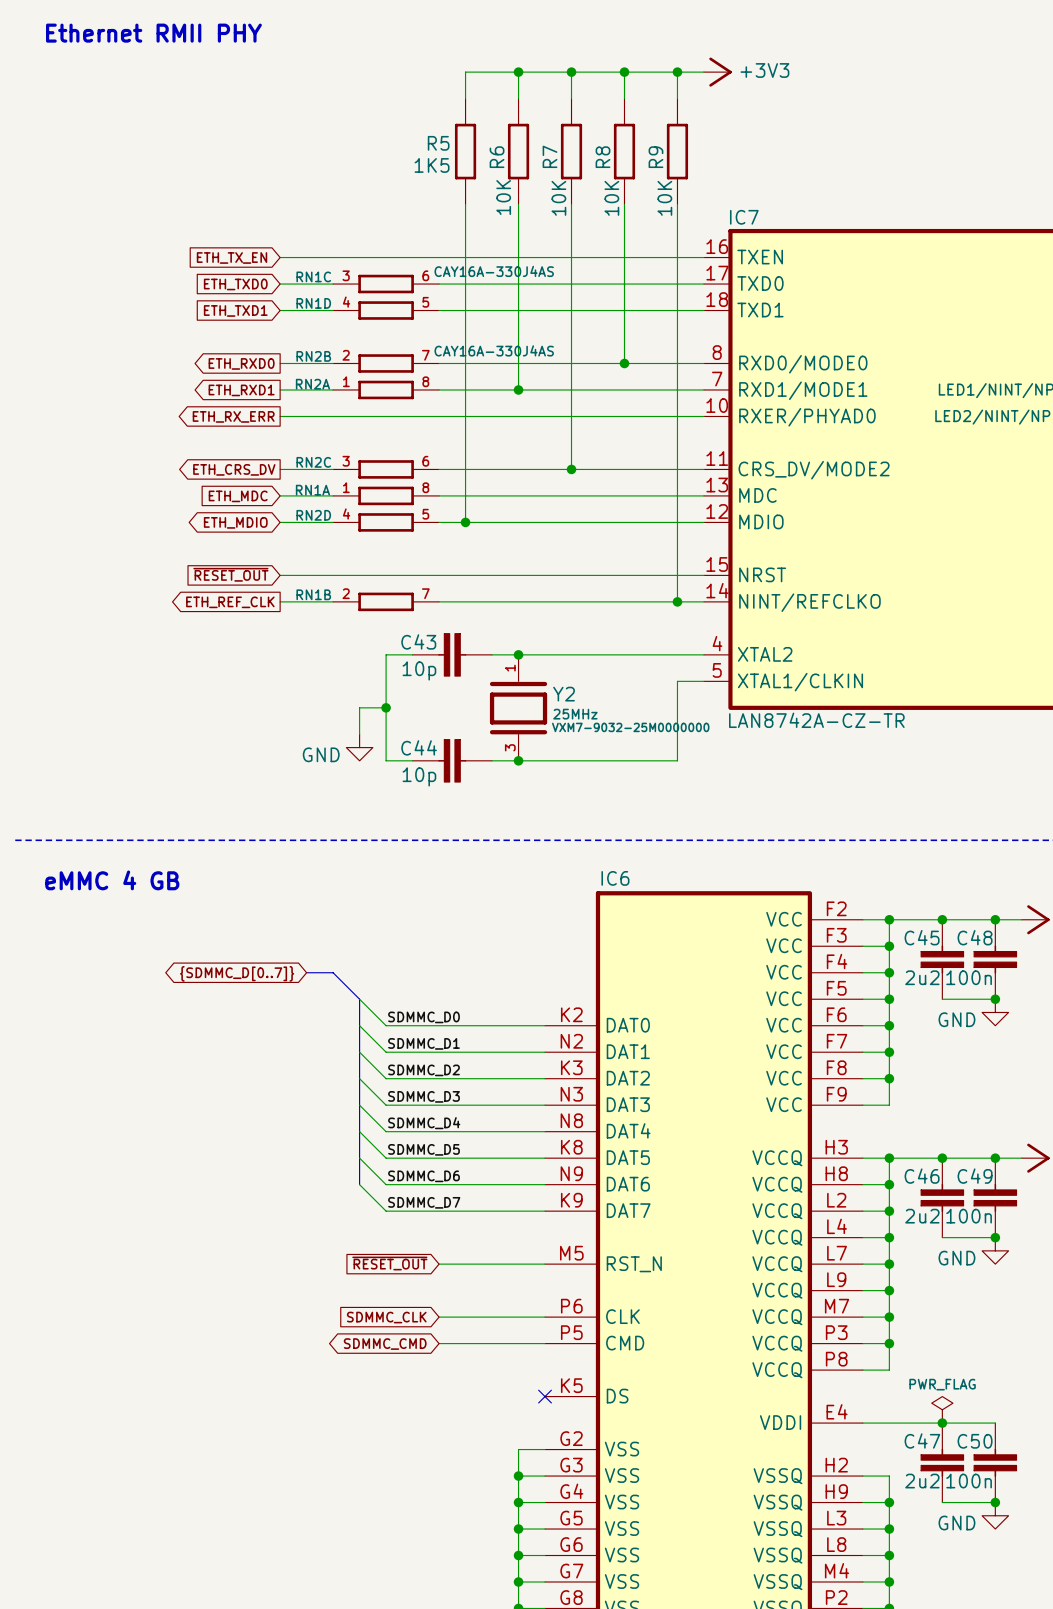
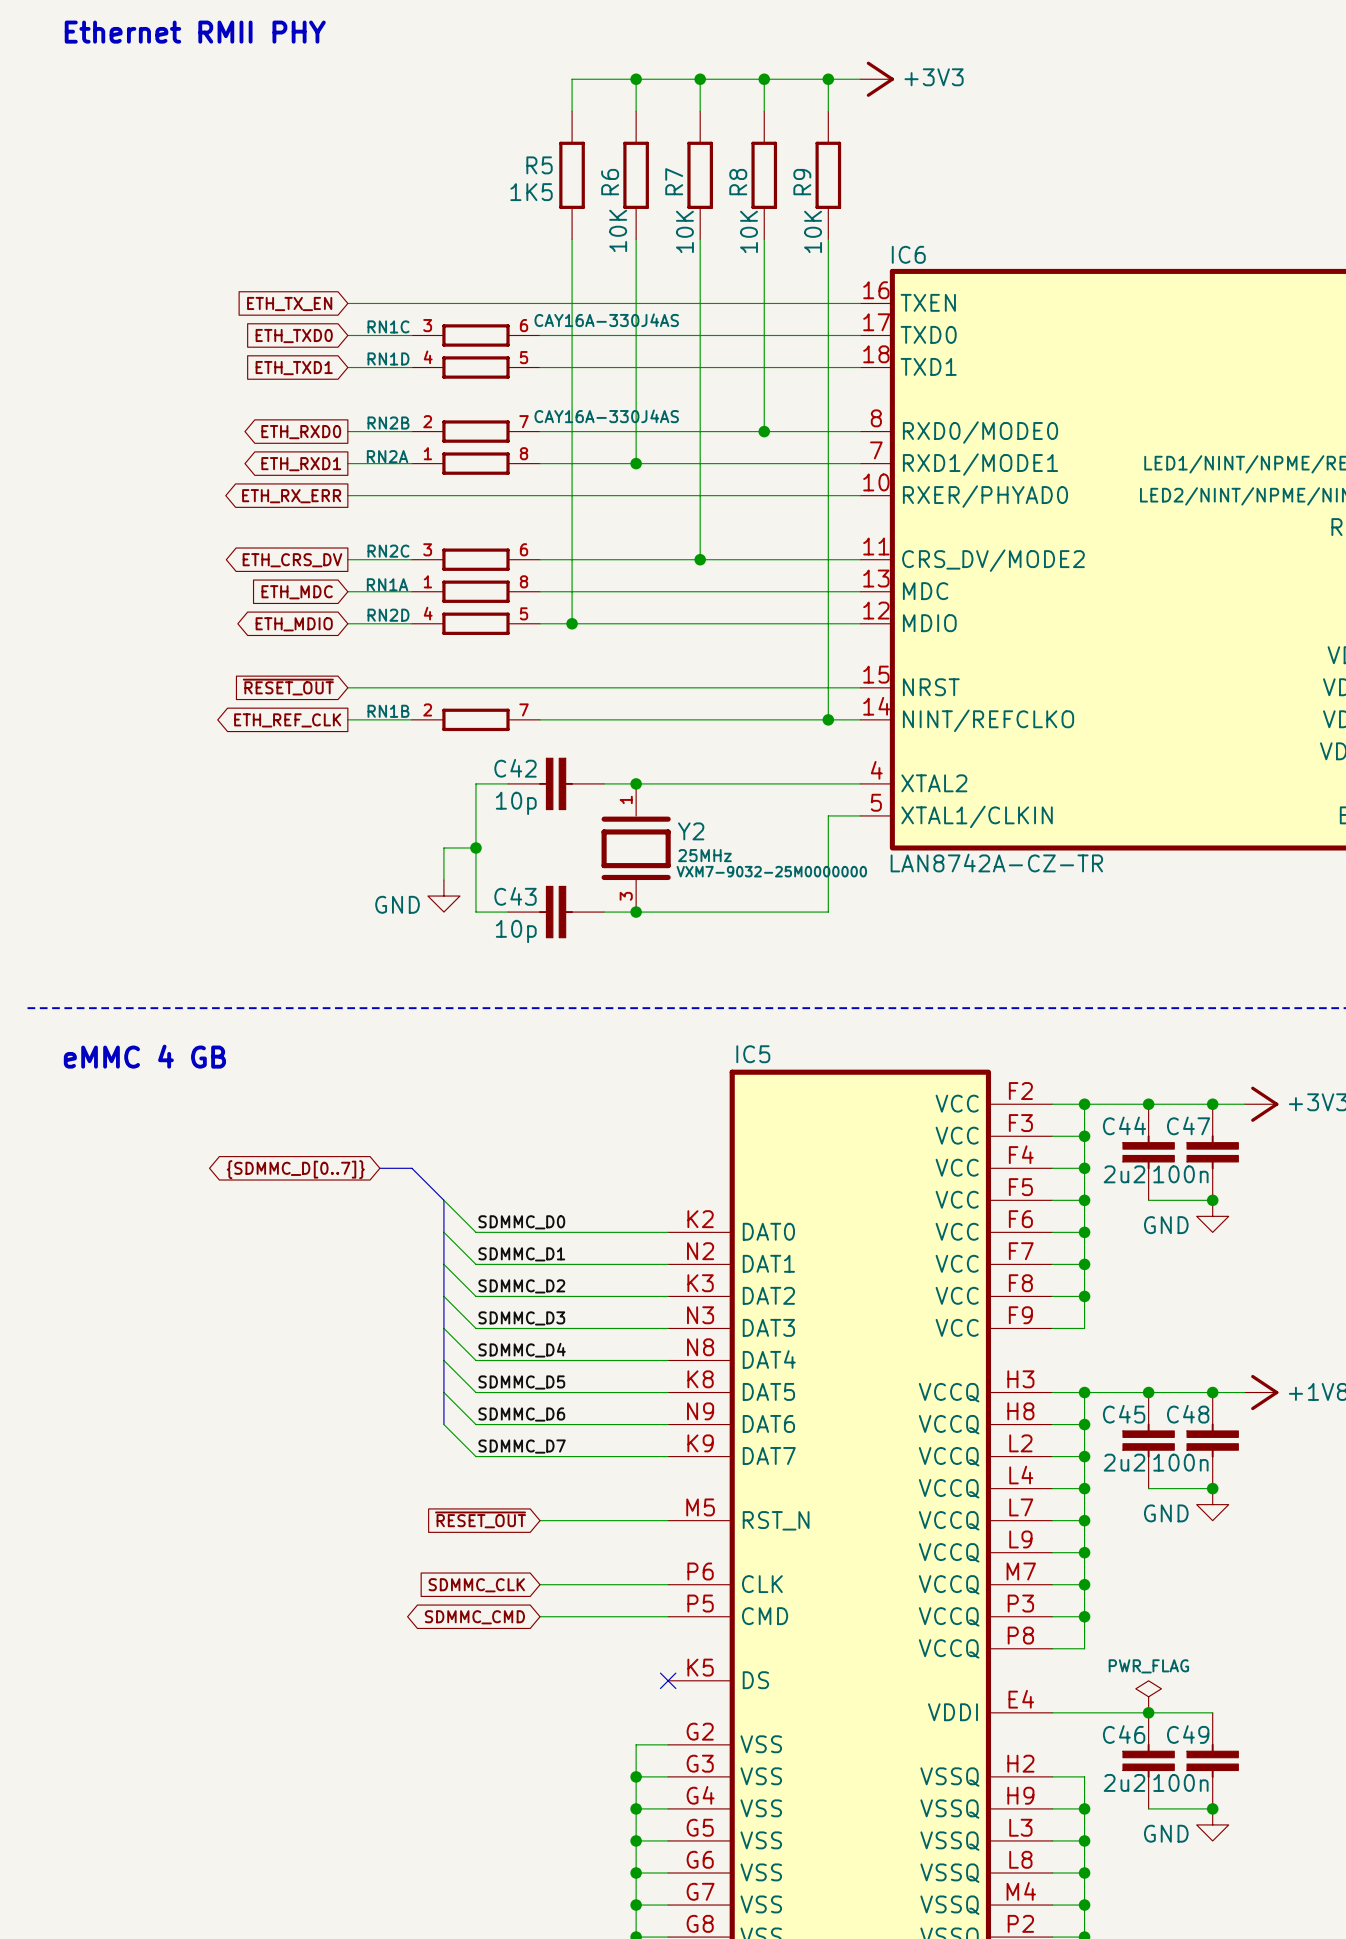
IC7 name: IC7 (744, 217) -> IC6 (908, 254)
C43 name: C43 (418, 641) -> C42 (515, 768)
C44 name: C44 (419, 747) -> C43 (515, 896)
IC6 name: IC6 (615, 878) -> IC5 (753, 1054)
C45 name: C45 (922, 937) -> C44 (1124, 1125)
C48 name: C48 (975, 937) -> C47 (1188, 1125)
C46 name: C46 (922, 1176) -> C45 (1124, 1414)
C49 name: C49 (975, 1176) -> C48 (1188, 1414)
C47 name: C47 (922, 1440) -> C46 (1124, 1734)
C50 name: C50 (975, 1441) -> C49 (1188, 1734)

